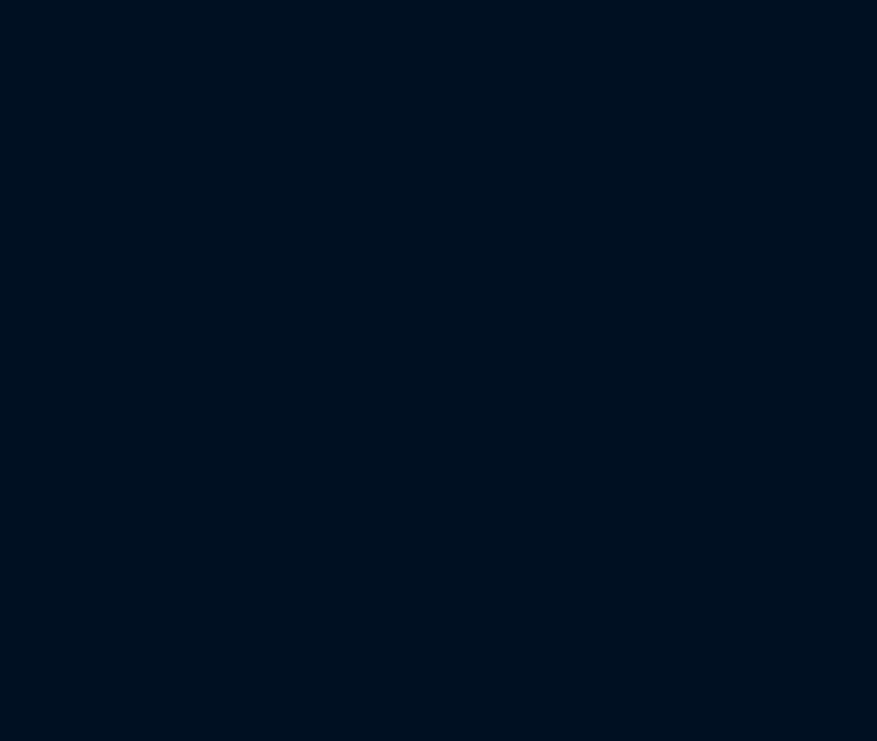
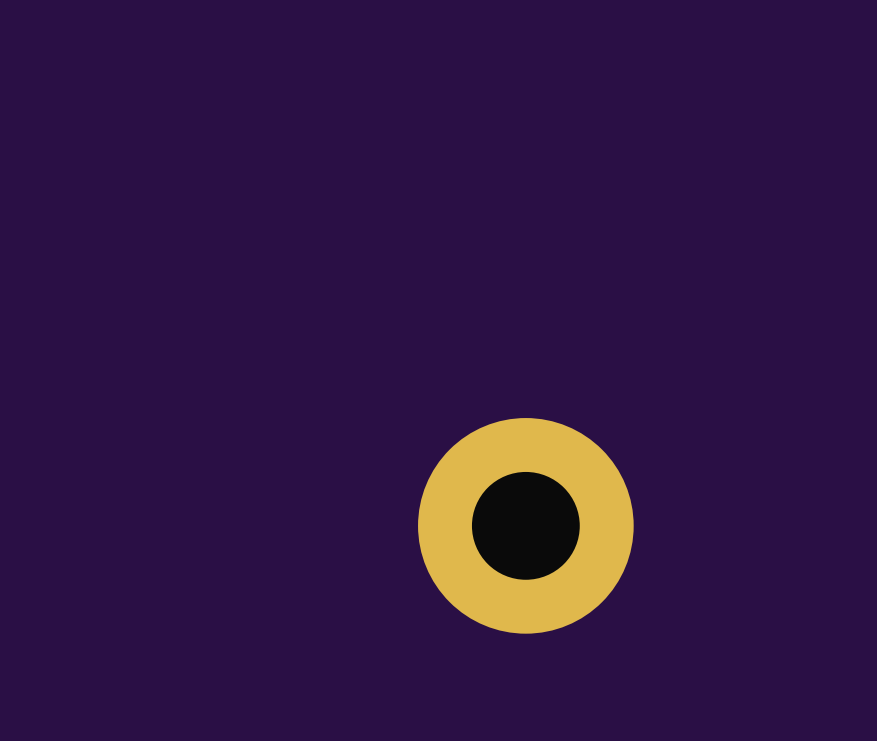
part: none -> (525, 525)

